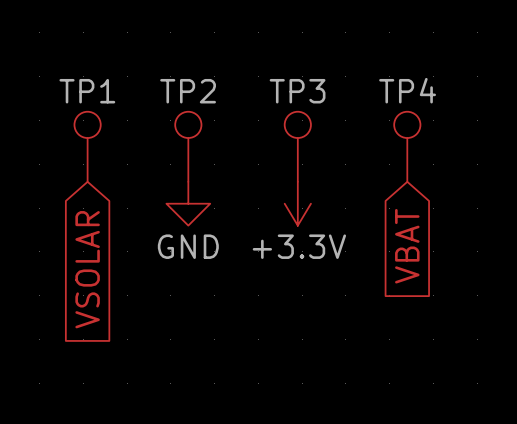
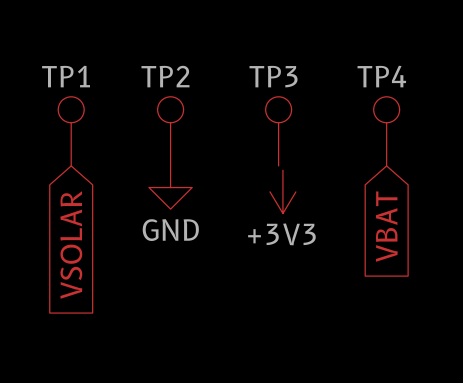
power symbol: +3.3V (297, 203) -> +3V3 (282, 191)

